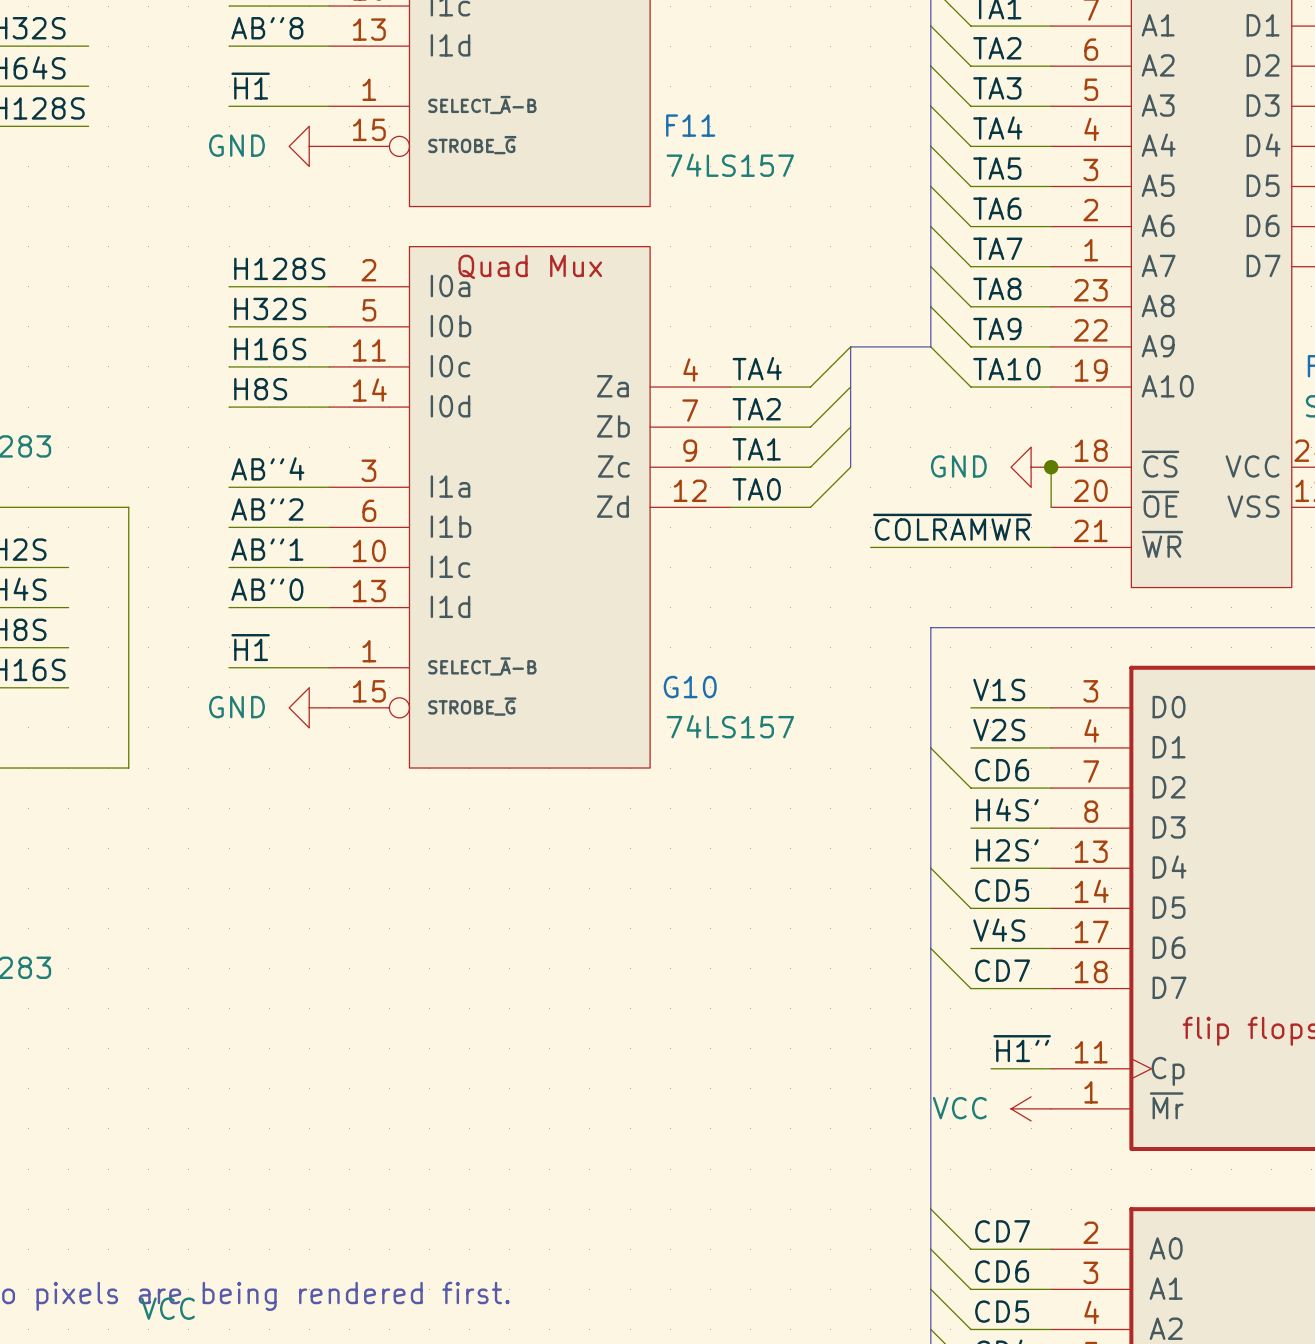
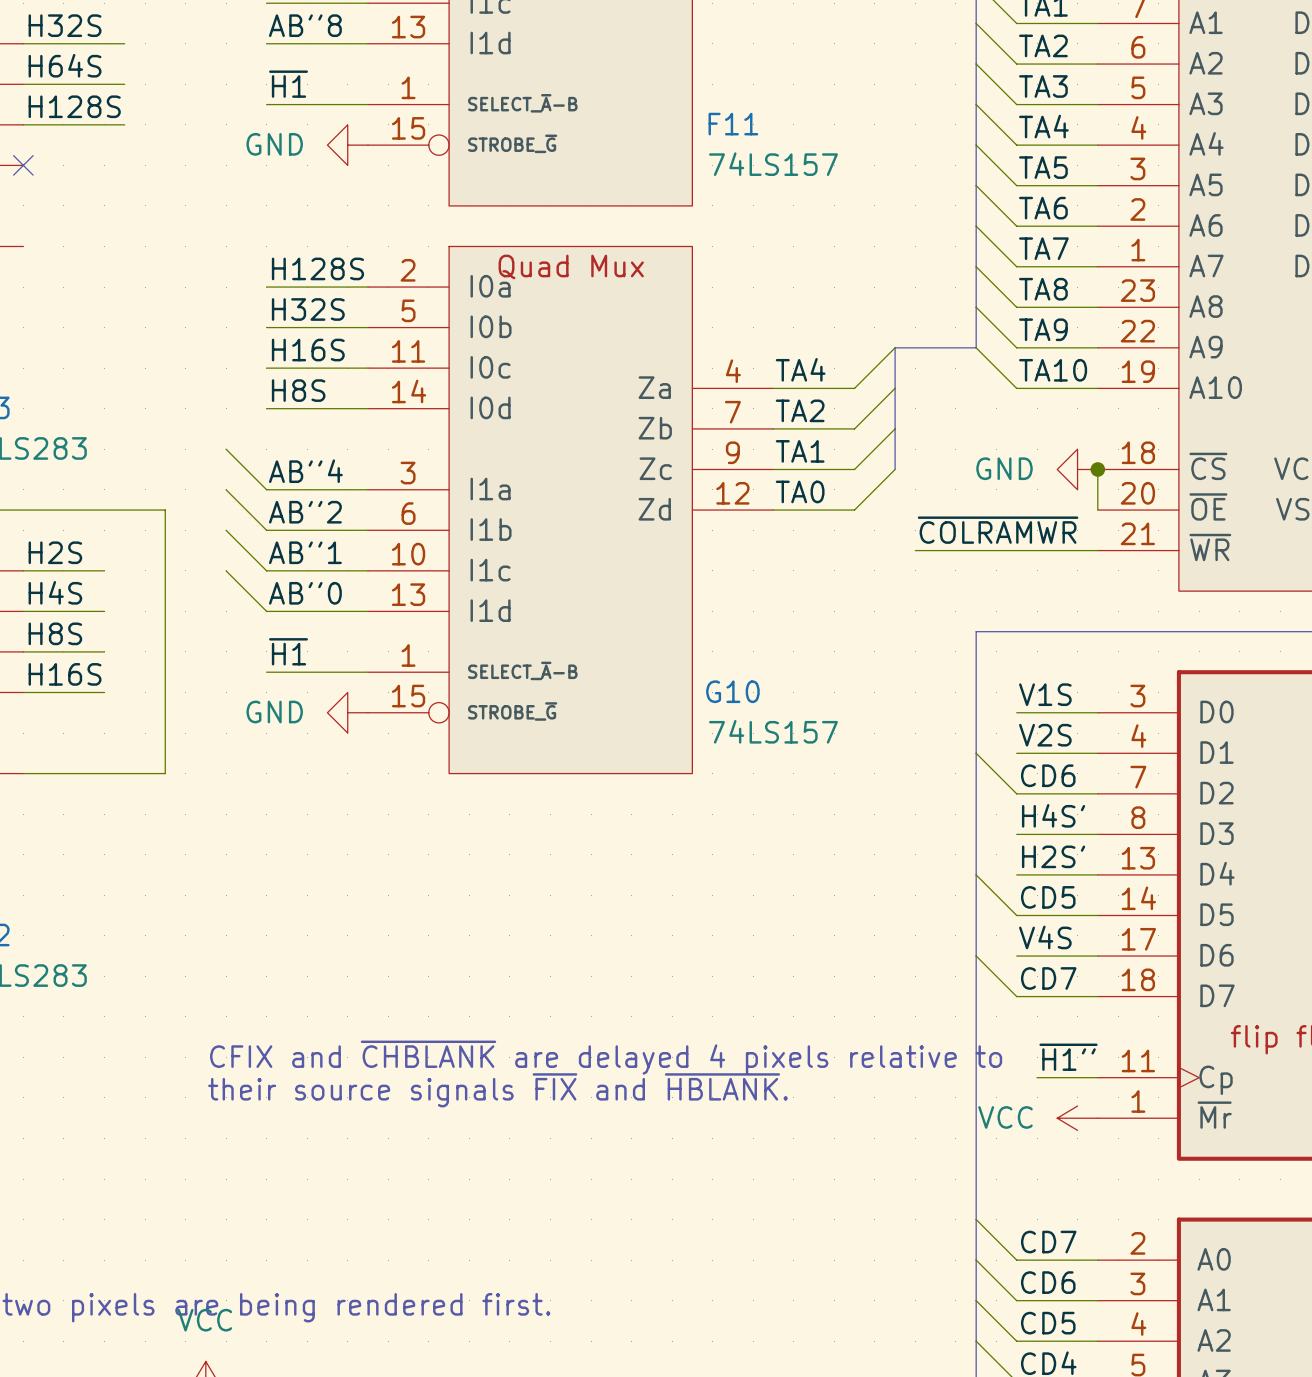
wire: none -> (226, 449) (266, 489)
wire: none -> (226, 489) (266, 530)
wire: none -> (226, 530) (266, 570)
wire: none -> (226, 570) (266, 611)
text: none -> CFIX and ~{CHBLANK} are delayed 4 pixels relative to (606, 1057)
text: none -> their source signals ~{FIX} and ~{HBLANK}. (497, 1090)

